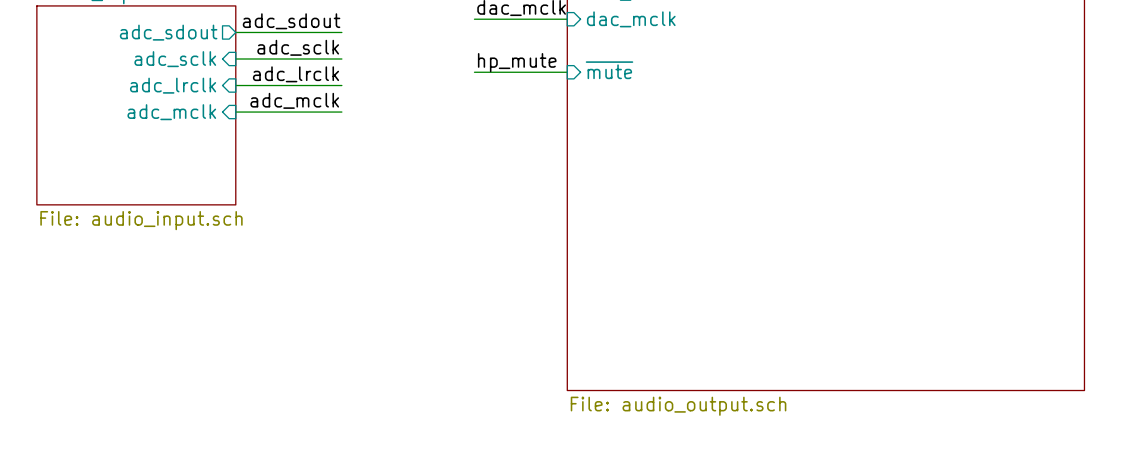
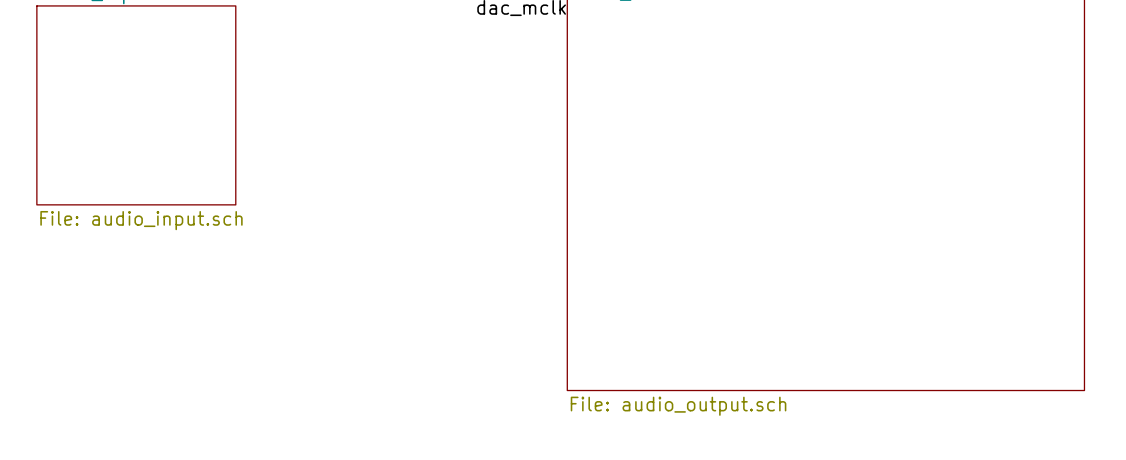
wire: (474, 19) (567, 19) -> none
sheet pin: dac_mclk (631, 19) -> none
label: adc_sdout (291, 21) -> none
sheet pin: adc_sdout (168, 32) -> none
wire: (235, 32) (341, 32) -> none
label: adc_sclk (298, 47) -> none
wire: (235, 58) (341, 58) -> none
sheet pin: adc_sclk (175, 59) -> none
label: hp_mute (517, 62) -> none
sheet pin: ~{mute} (609, 70) -> none
wire: (474, 72) (567, 72) -> none
label: adc_lrclk (295, 74) -> none
sheet pin: adc_lrclk (173, 85) -> none
wire: (235, 85) (341, 85) -> none
label: adc_mclk (294, 100) -> none
sheet pin: adc_mclk (171, 112) -> none
wire: (235, 112) (341, 112) -> none

